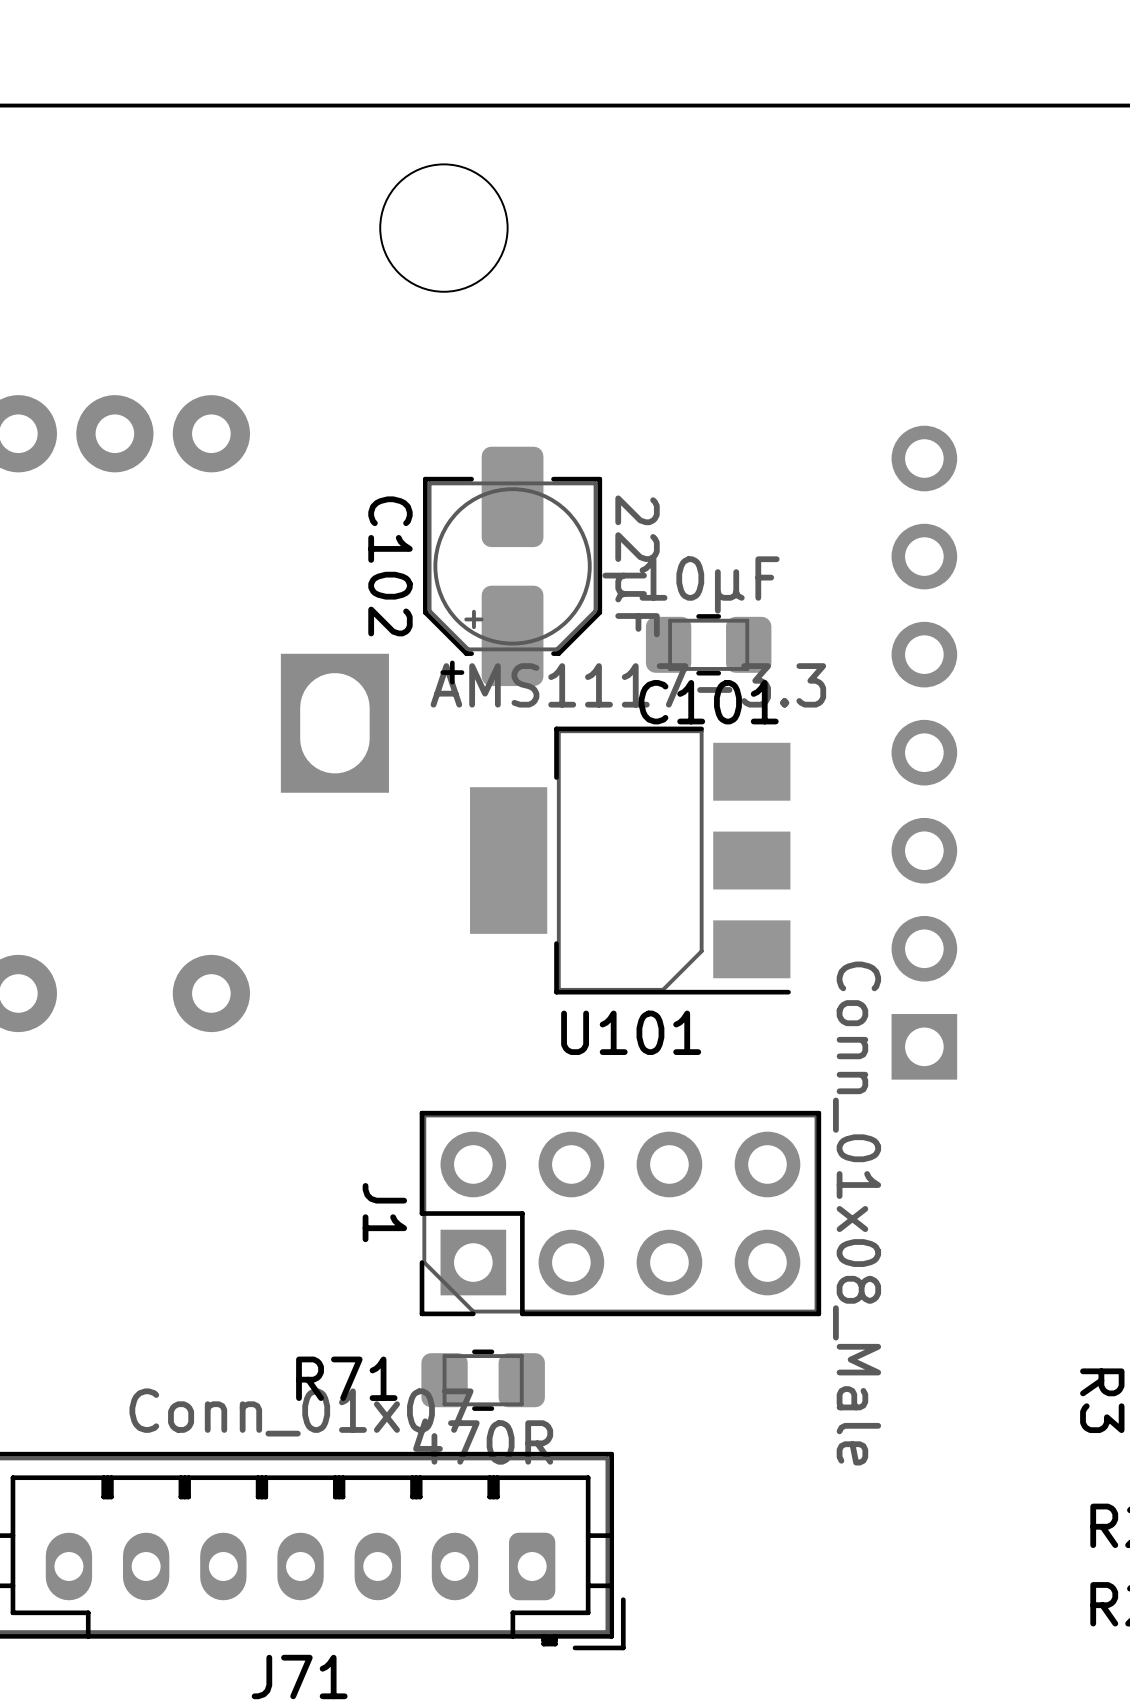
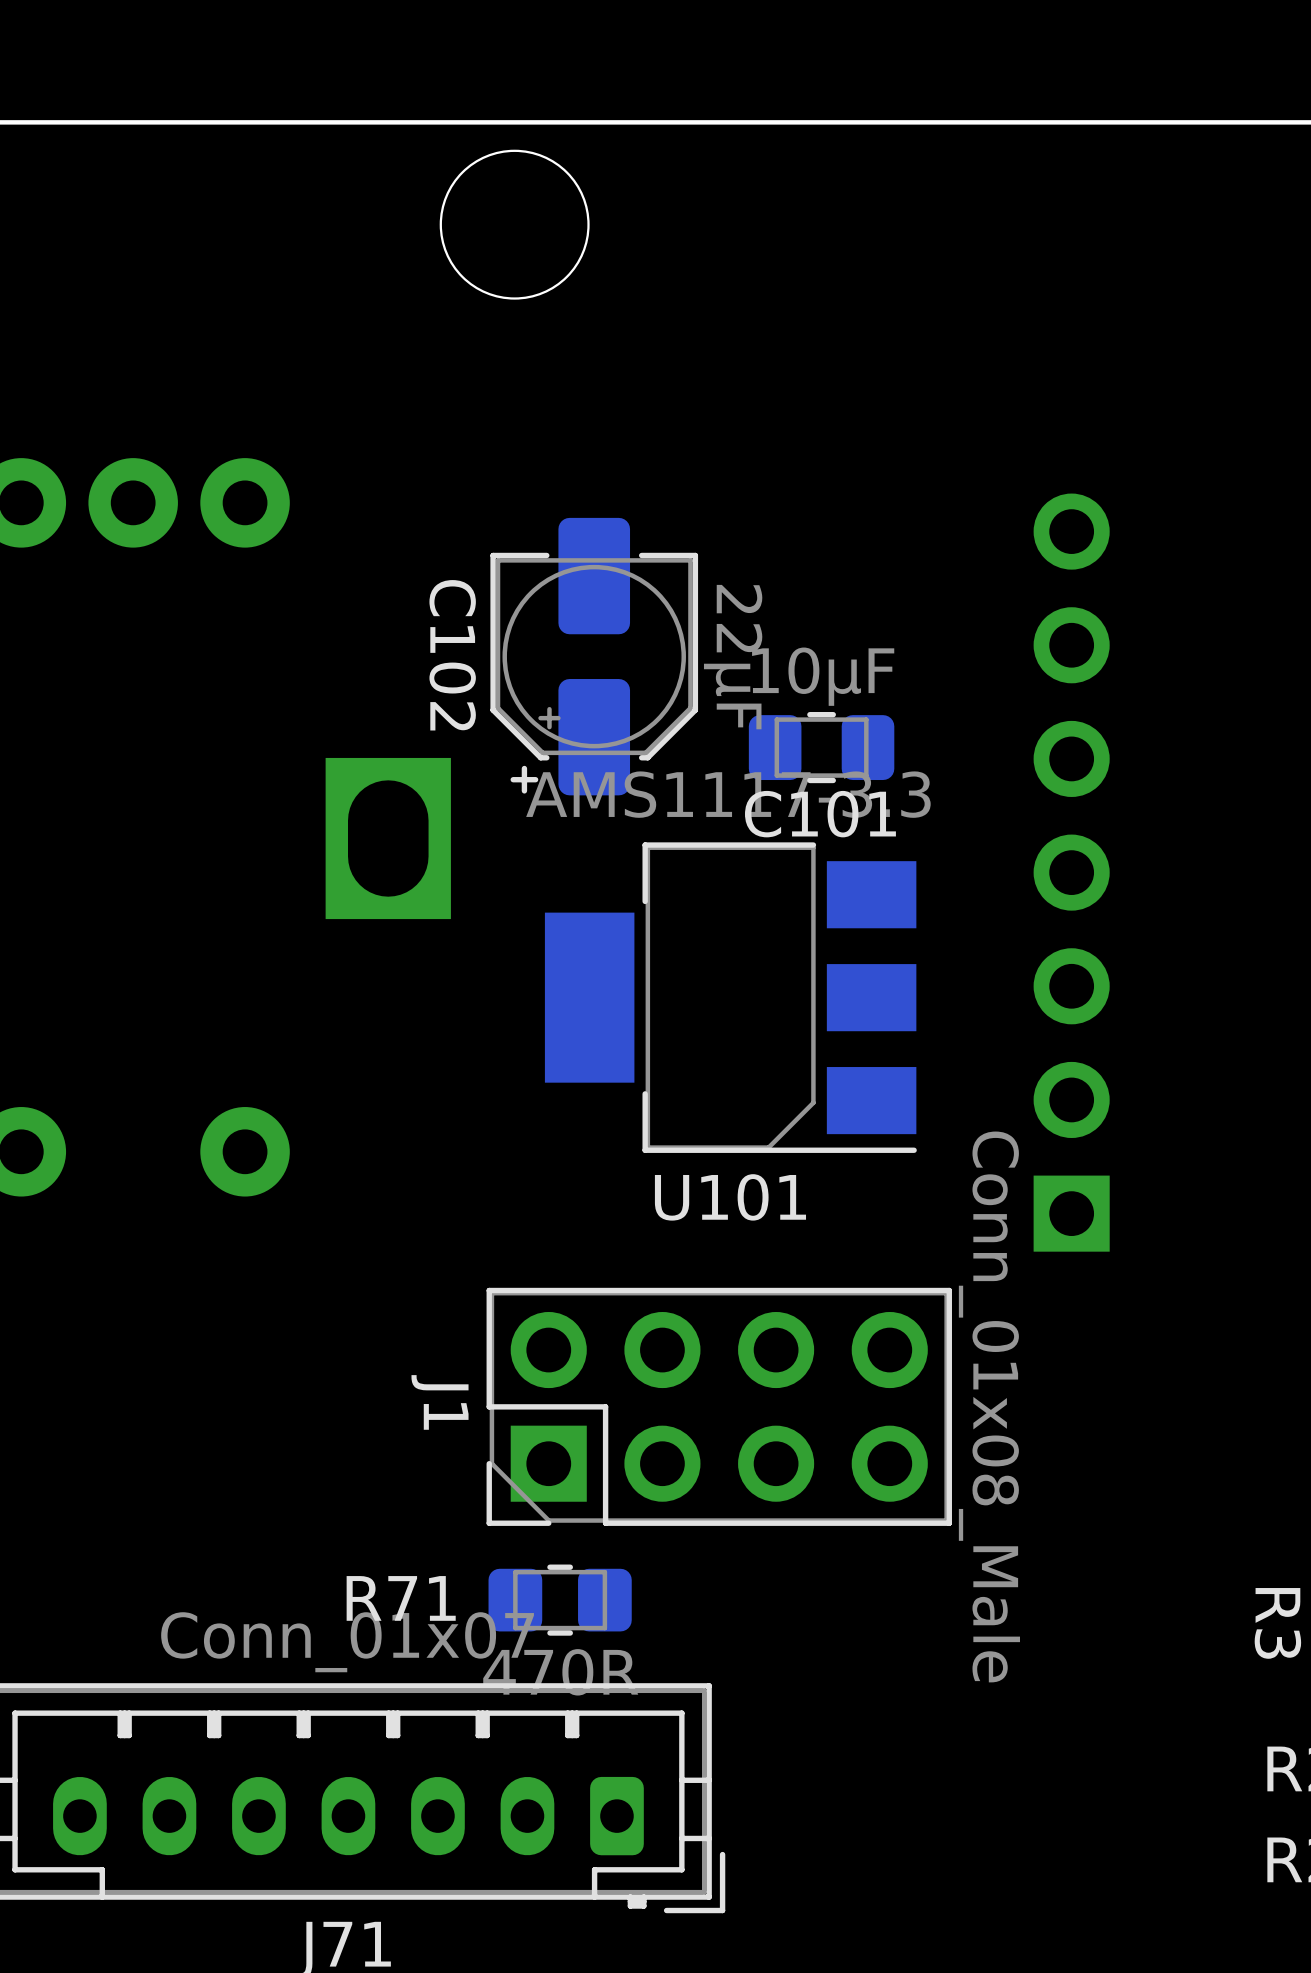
round board edge position: (443, 228) -> (514, 224)

